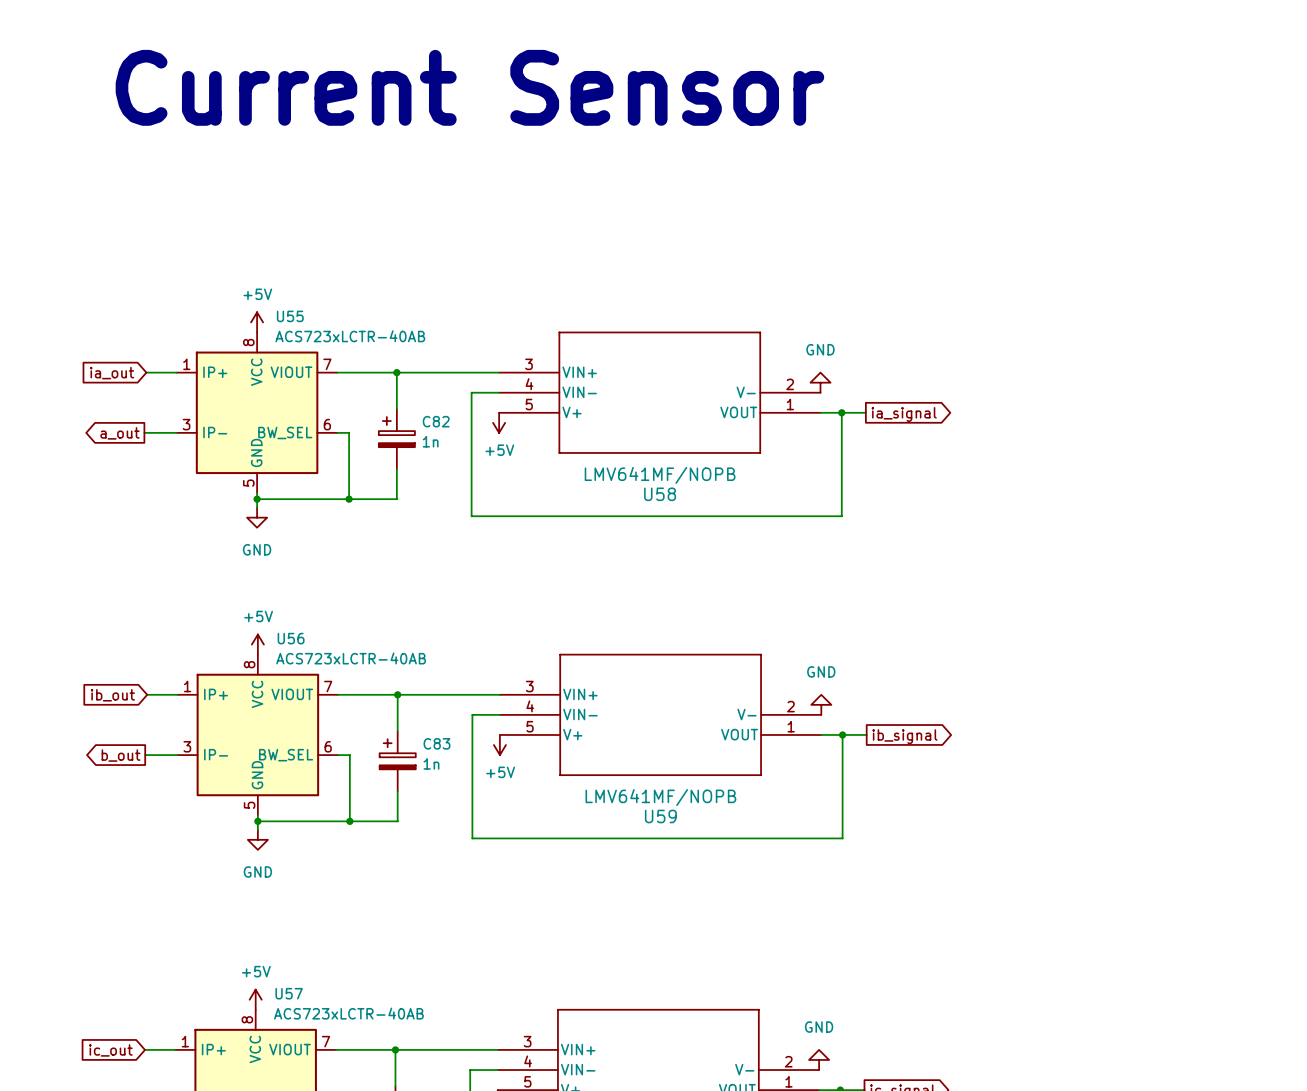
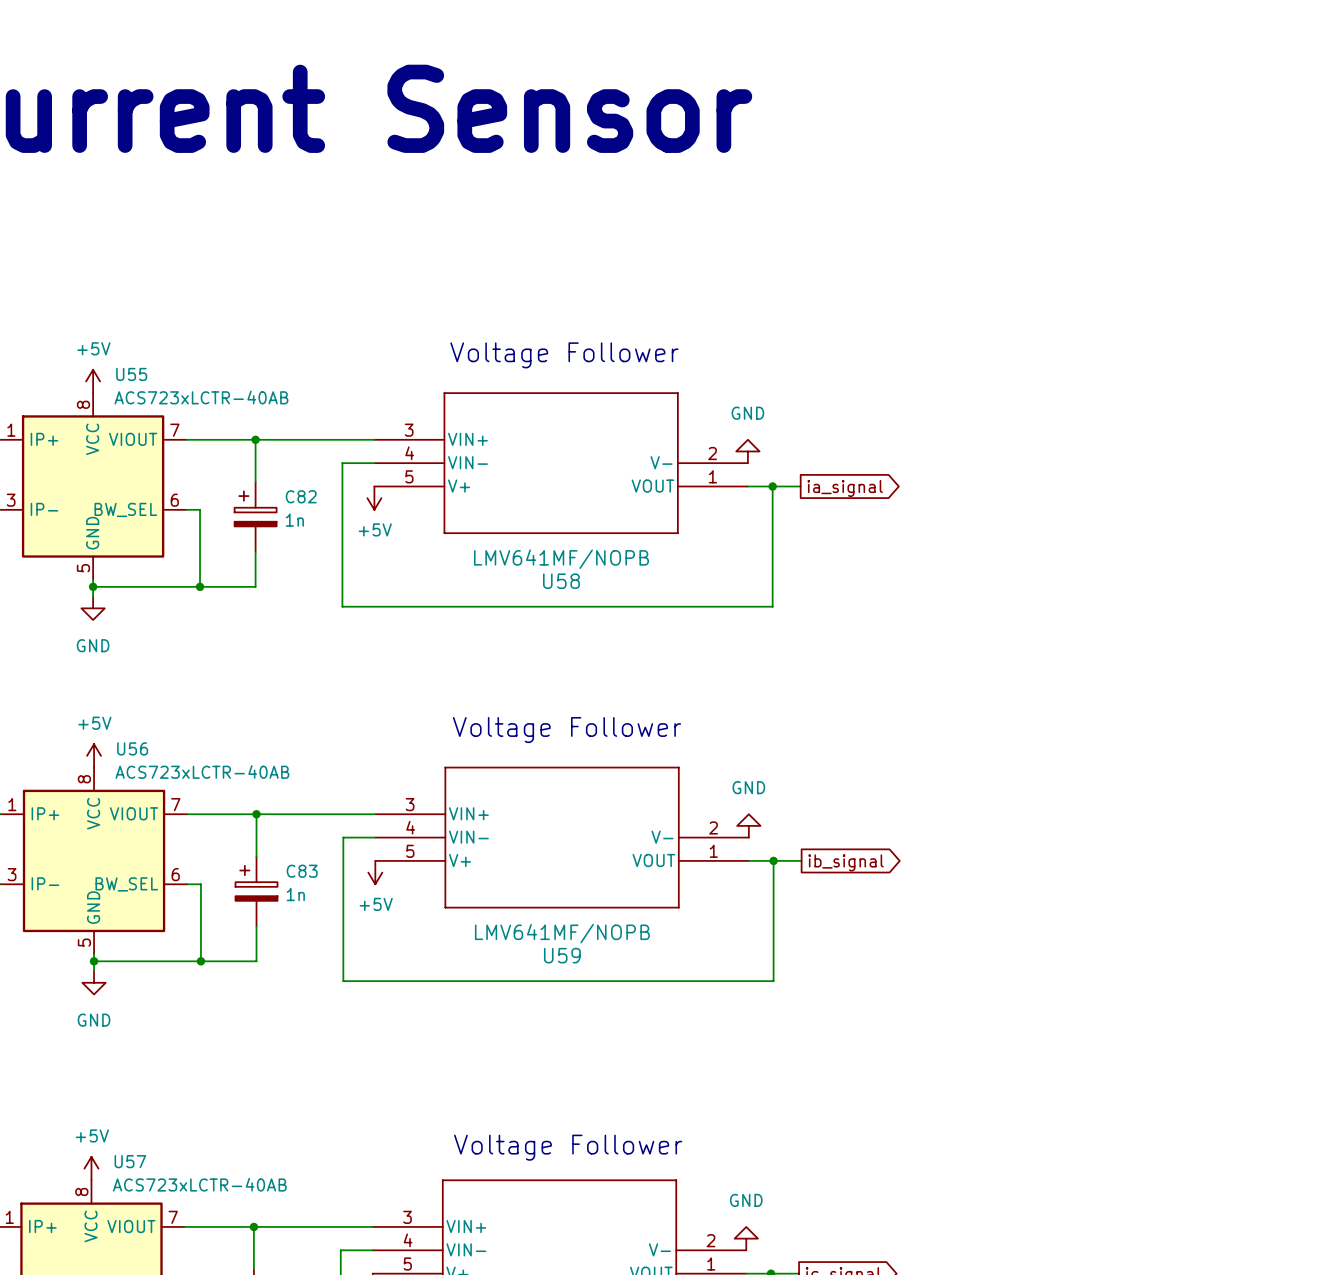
text: none -> Voltage Follower (564, 355)
text: none -> Voltage Follower (567, 730)
text: none -> Voltage Follower (568, 1147)

